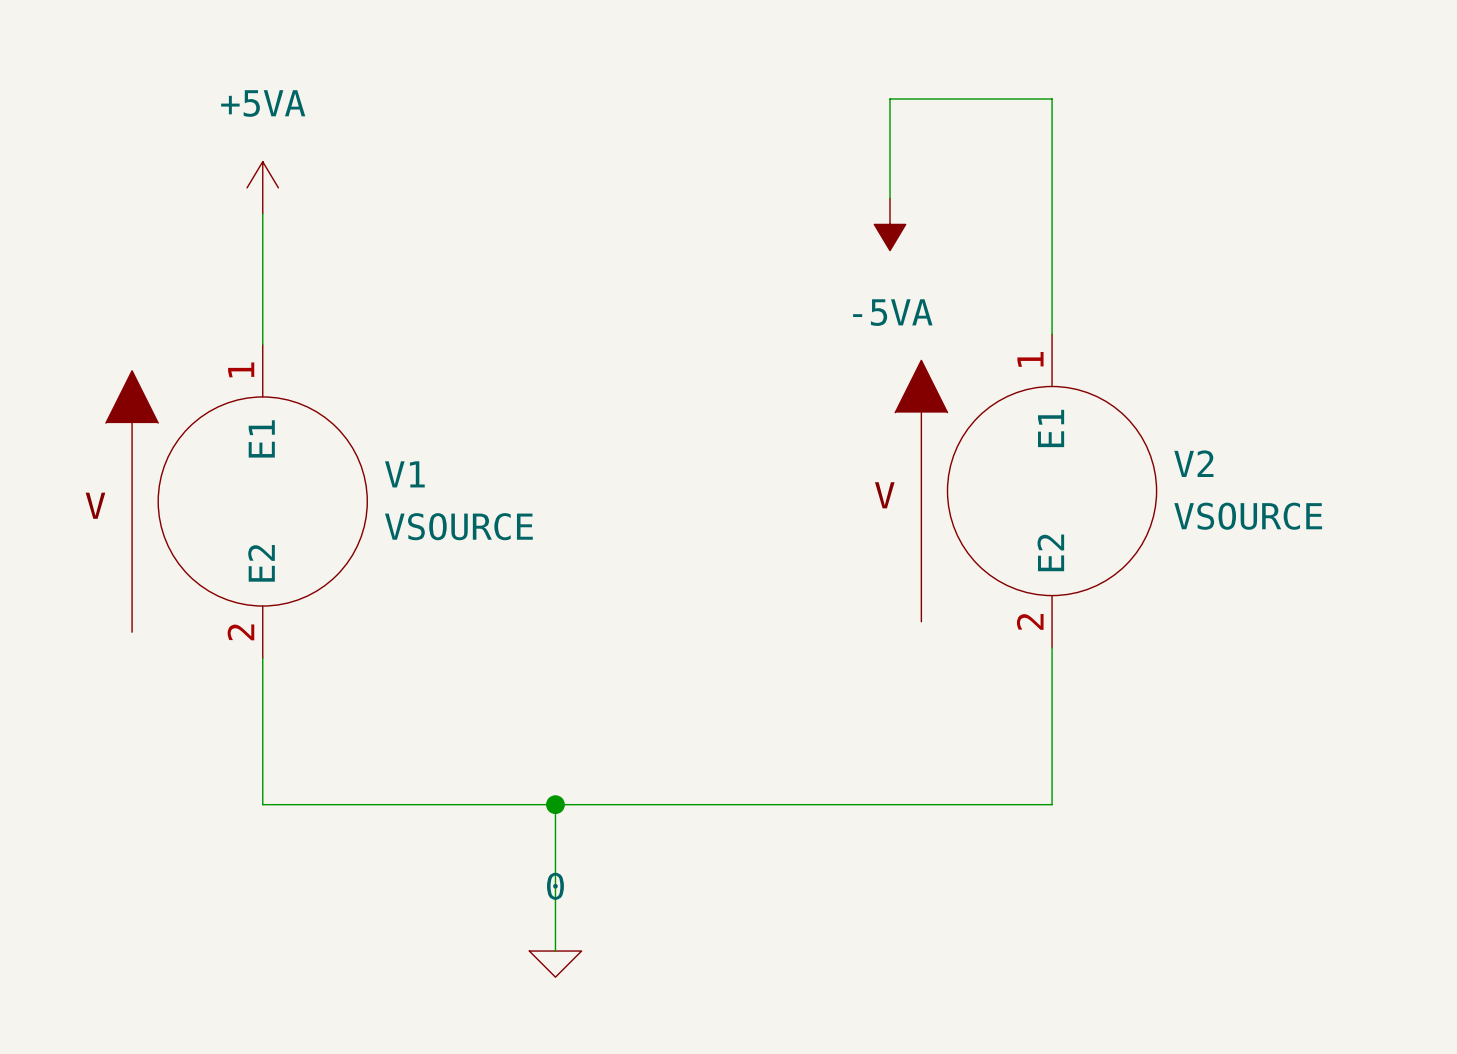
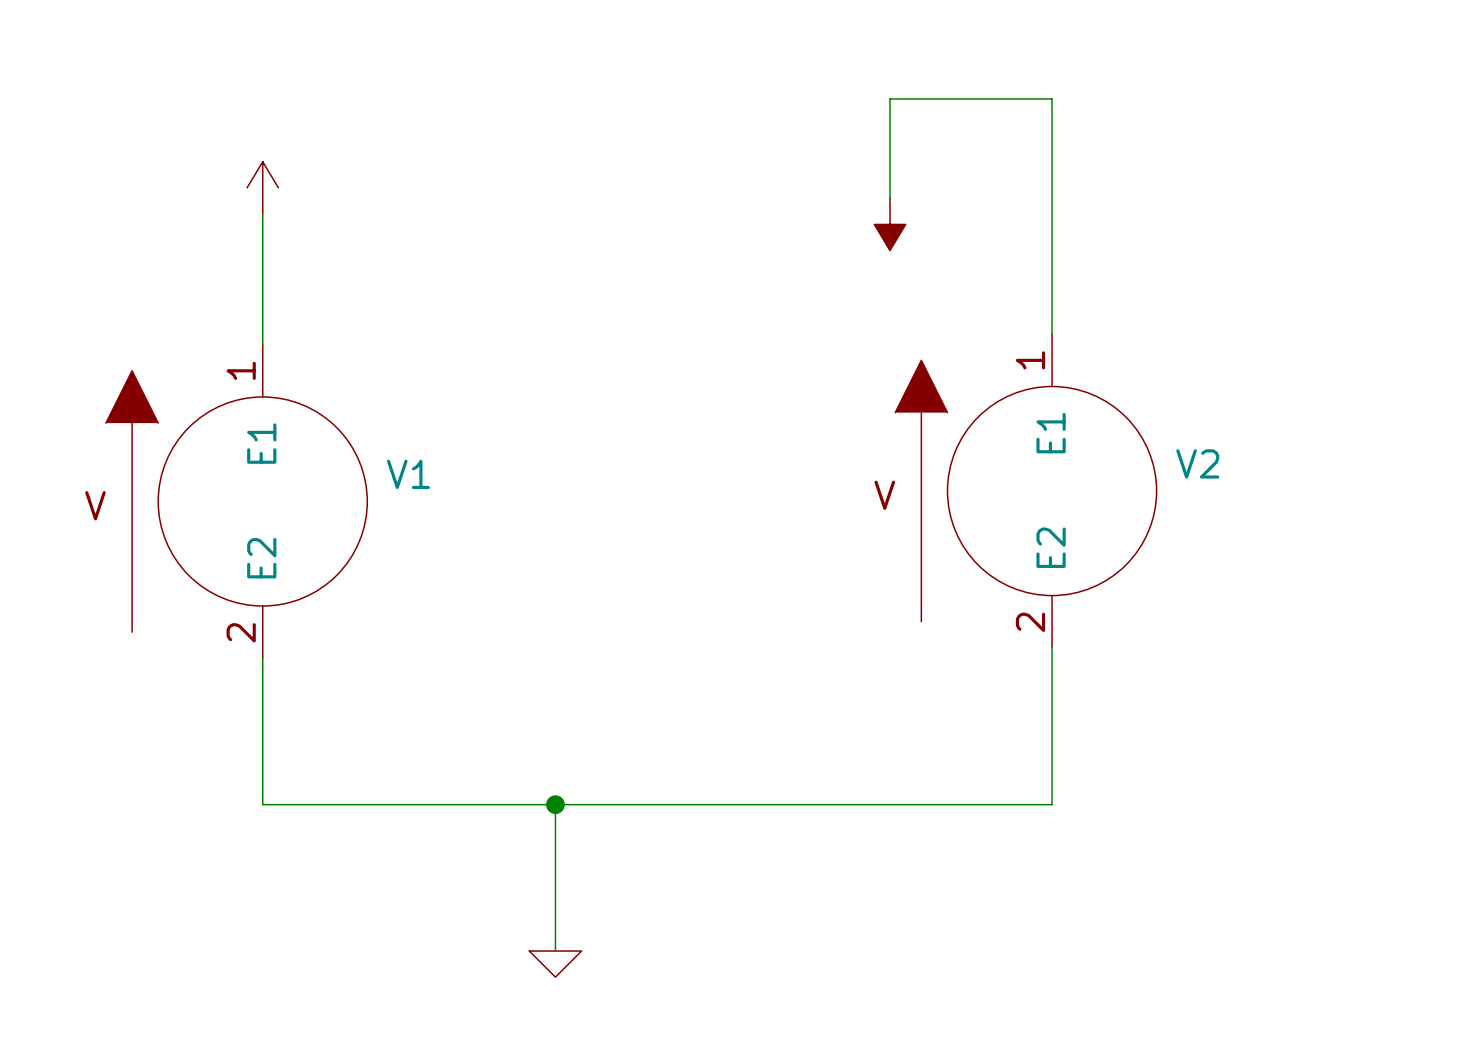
power symbol text: +5VA (263, 103) -> none
power symbol text: -5VA (892, 312) -> none
V2 value: VSOURCE (1248, 516) -> none
V1 value: VSOURCE (458, 526) -> none
power symbol text: 0 (555, 886) -> none

